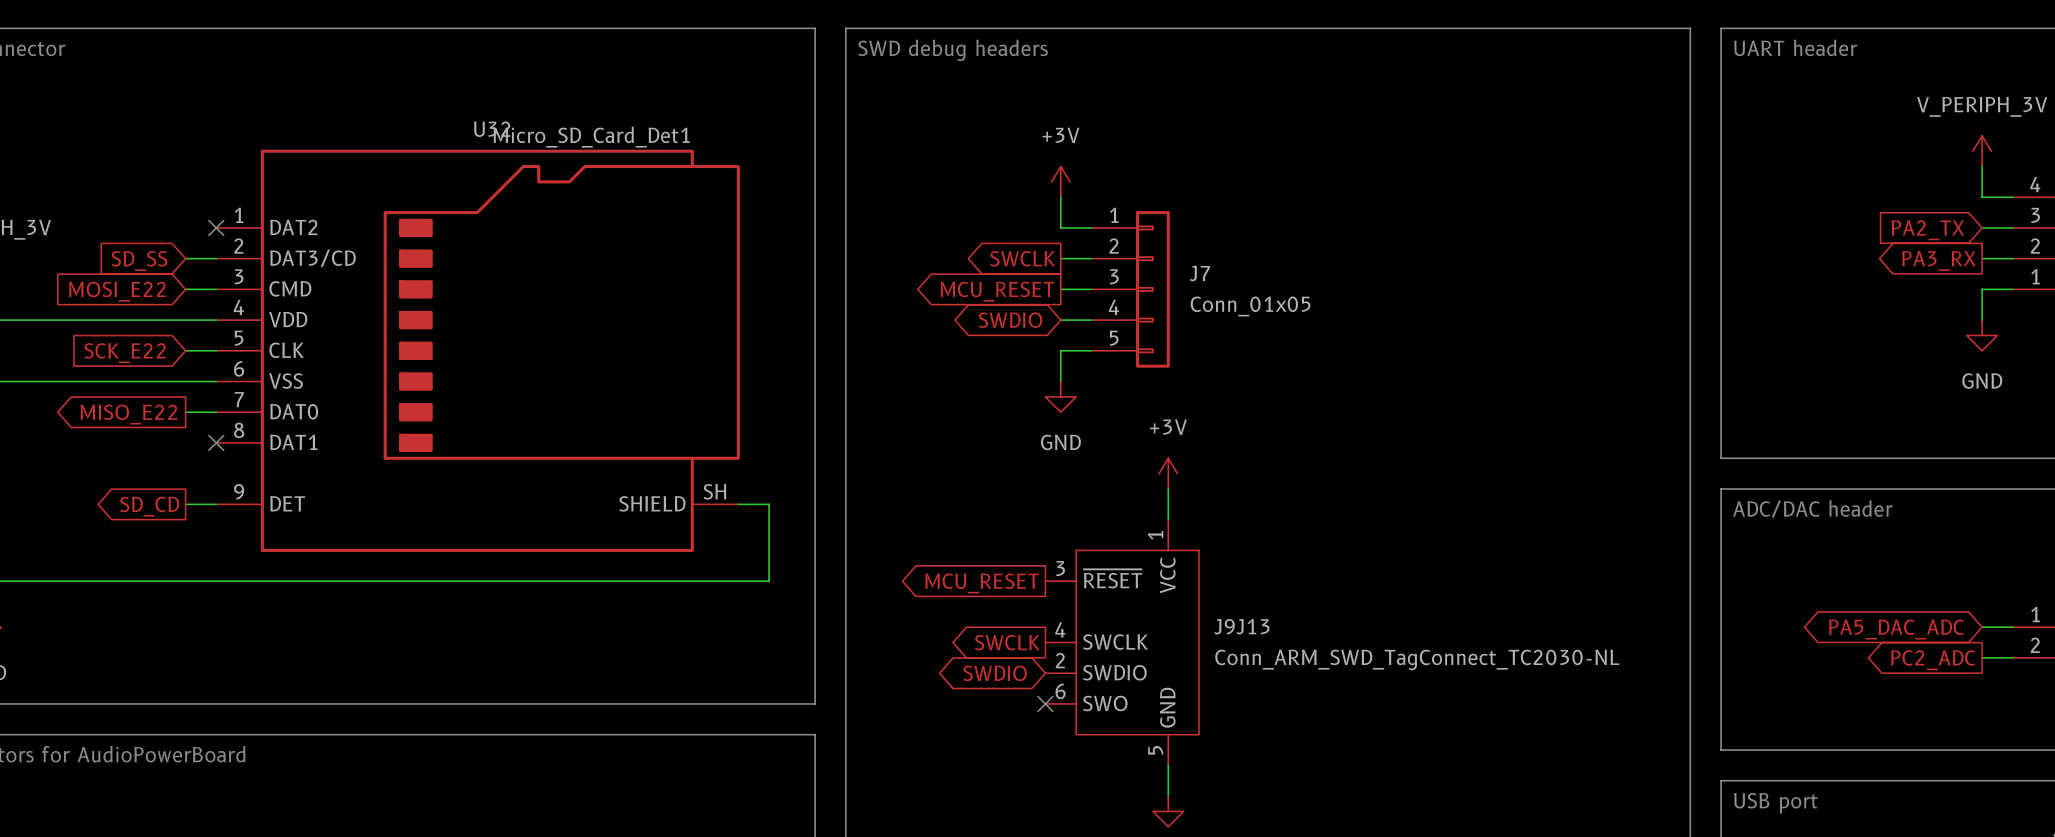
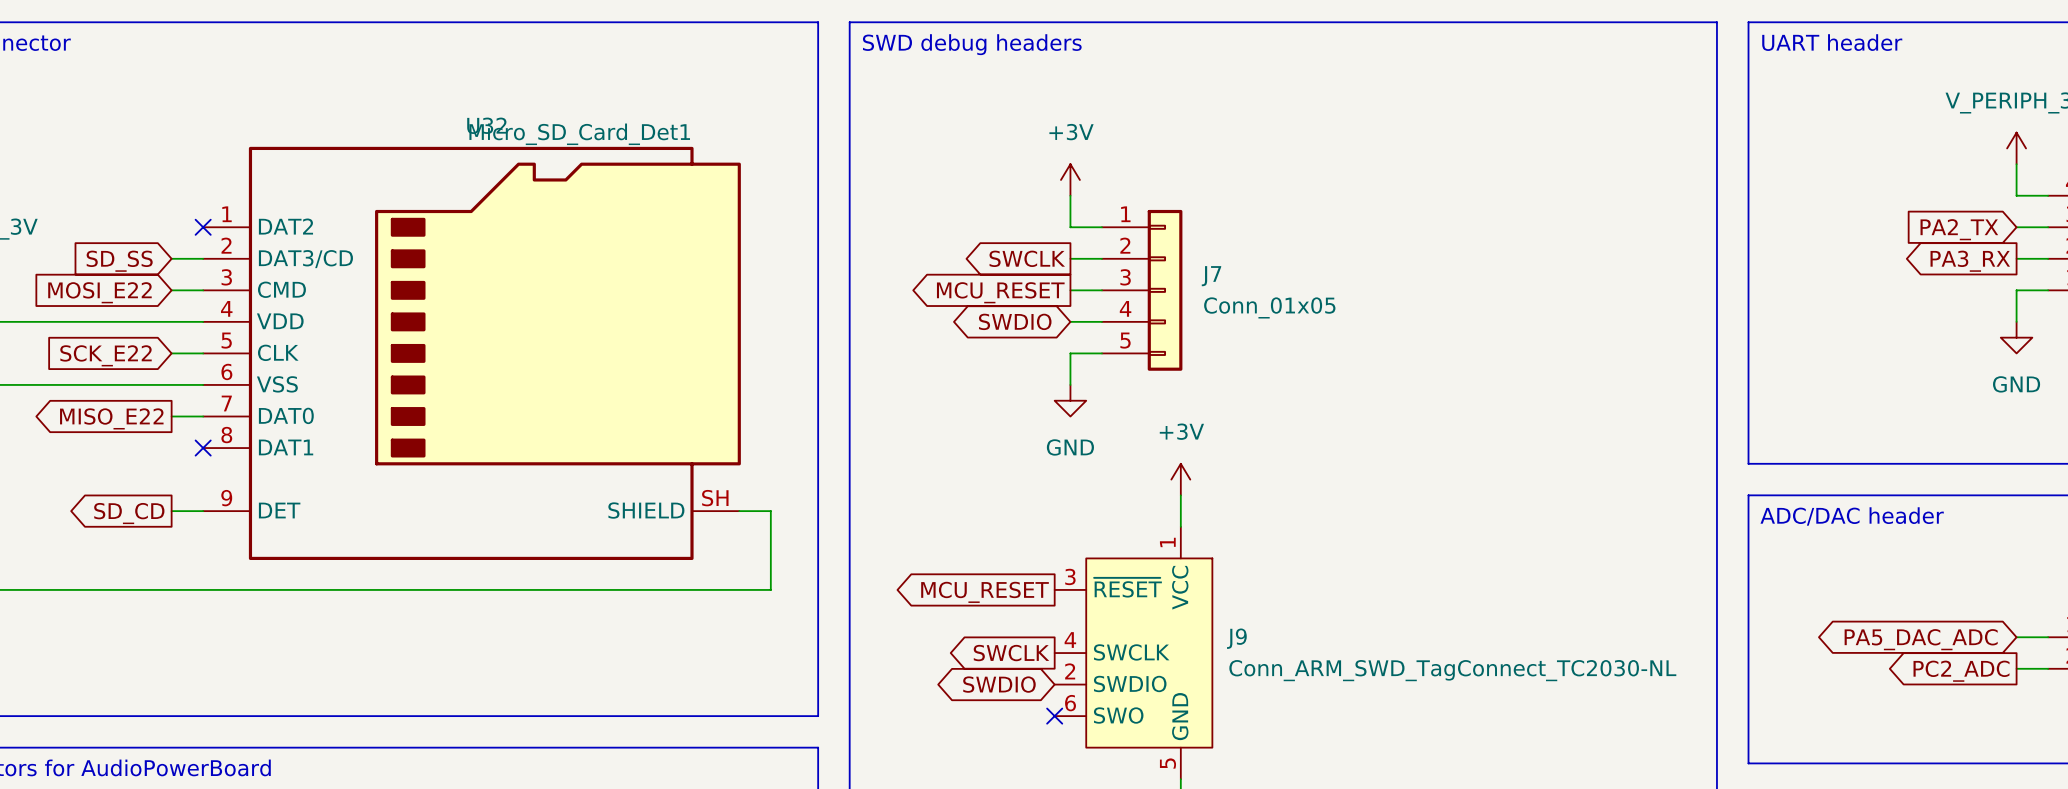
J9J13 name: J9J13 (1241, 626) -> J9 (1236, 638)

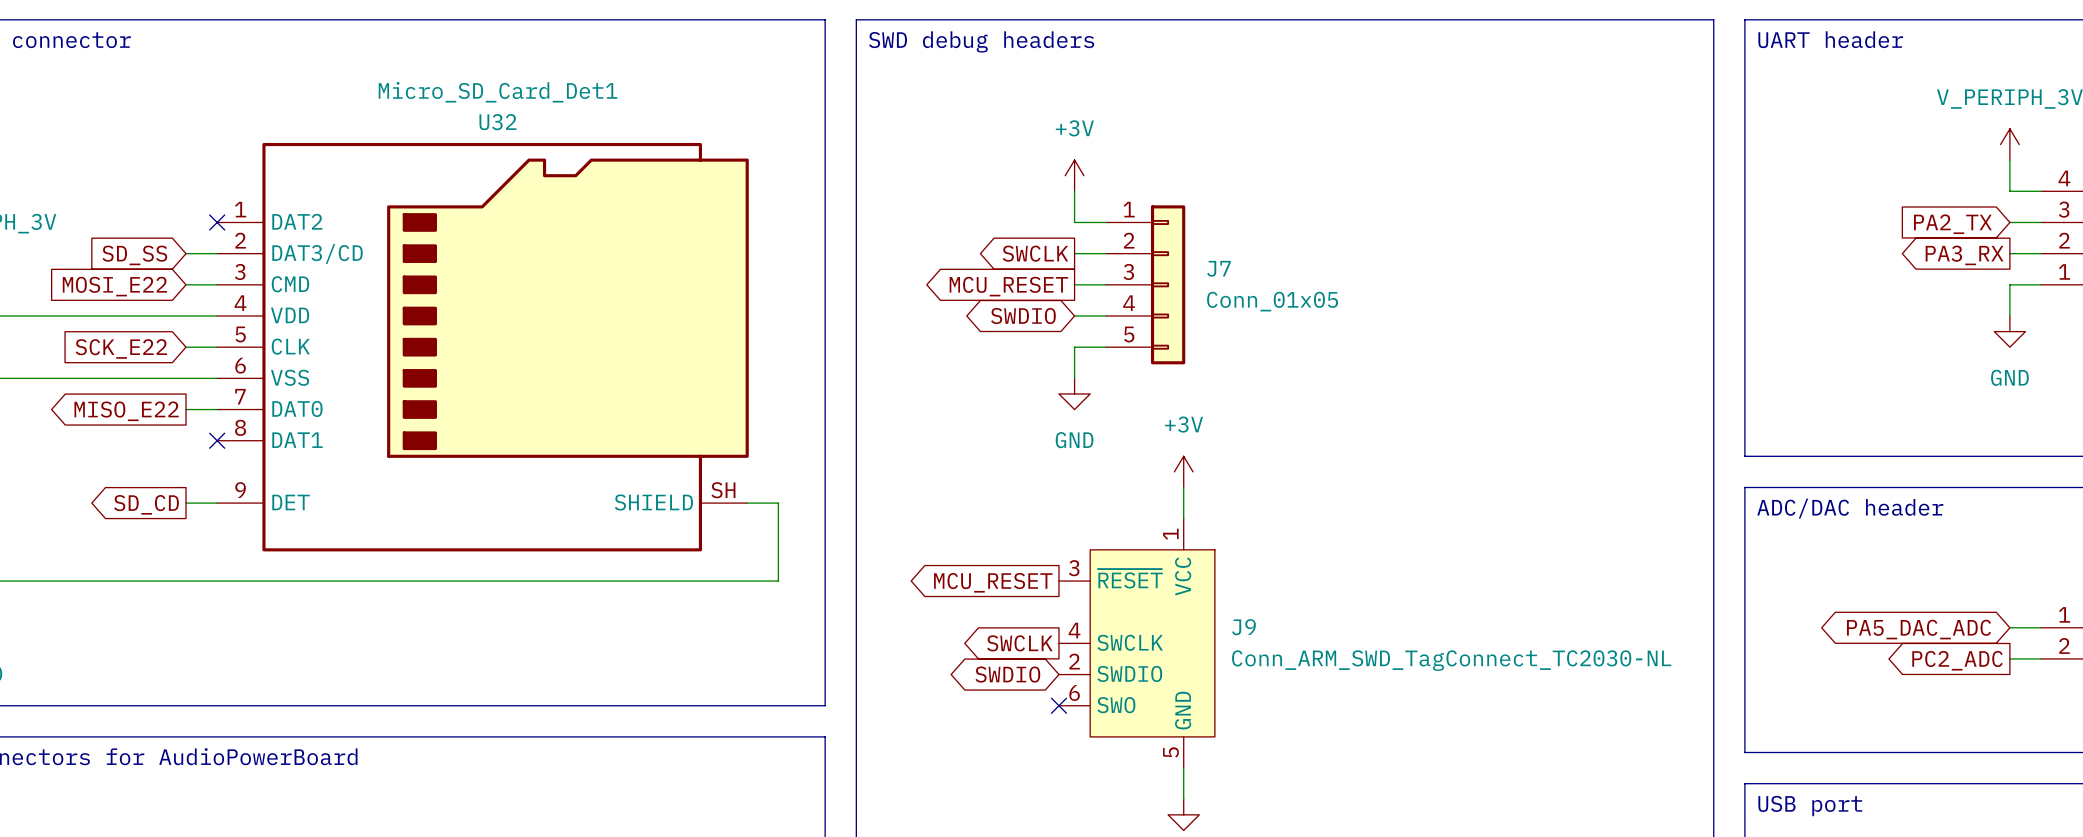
U32 value position: Micro_SD_Card_Det1 (579, 134) -> Micro_SD_Card_Det1 (498, 92)

